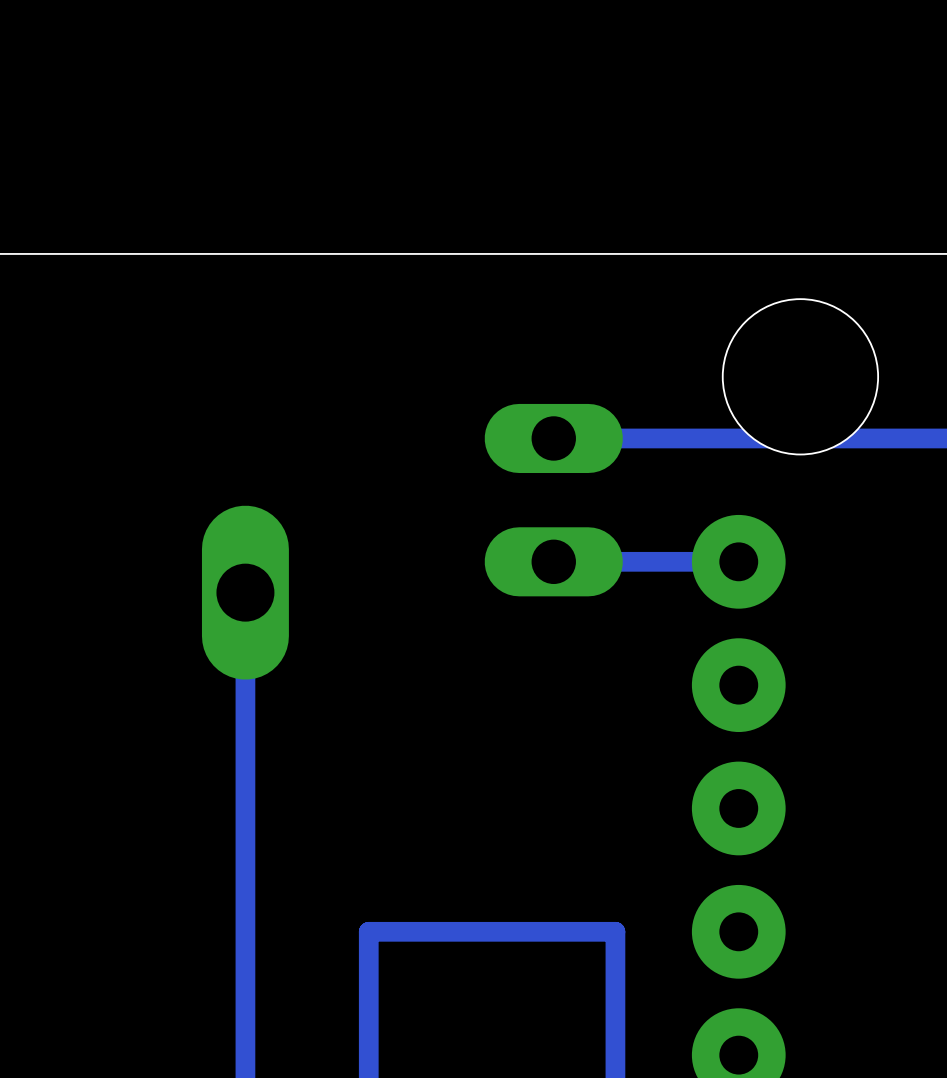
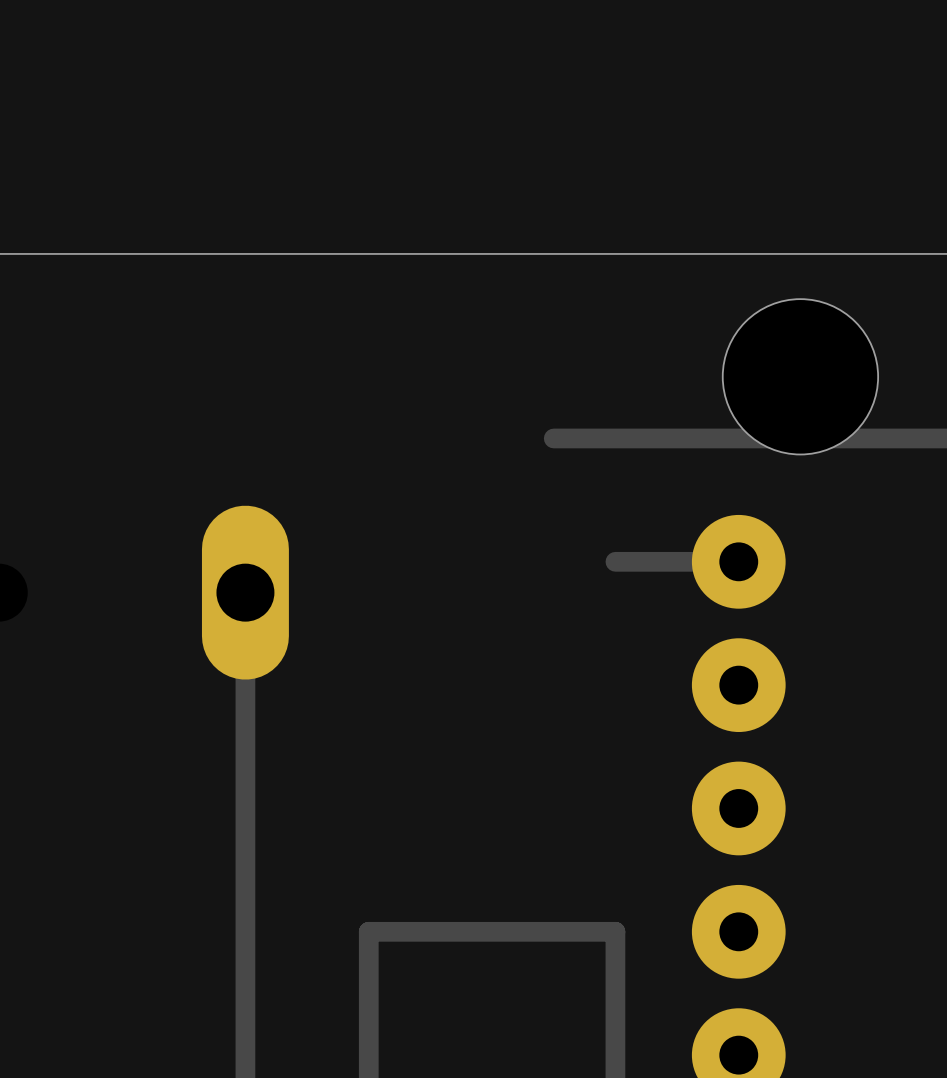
part: (553, 500) -> none

